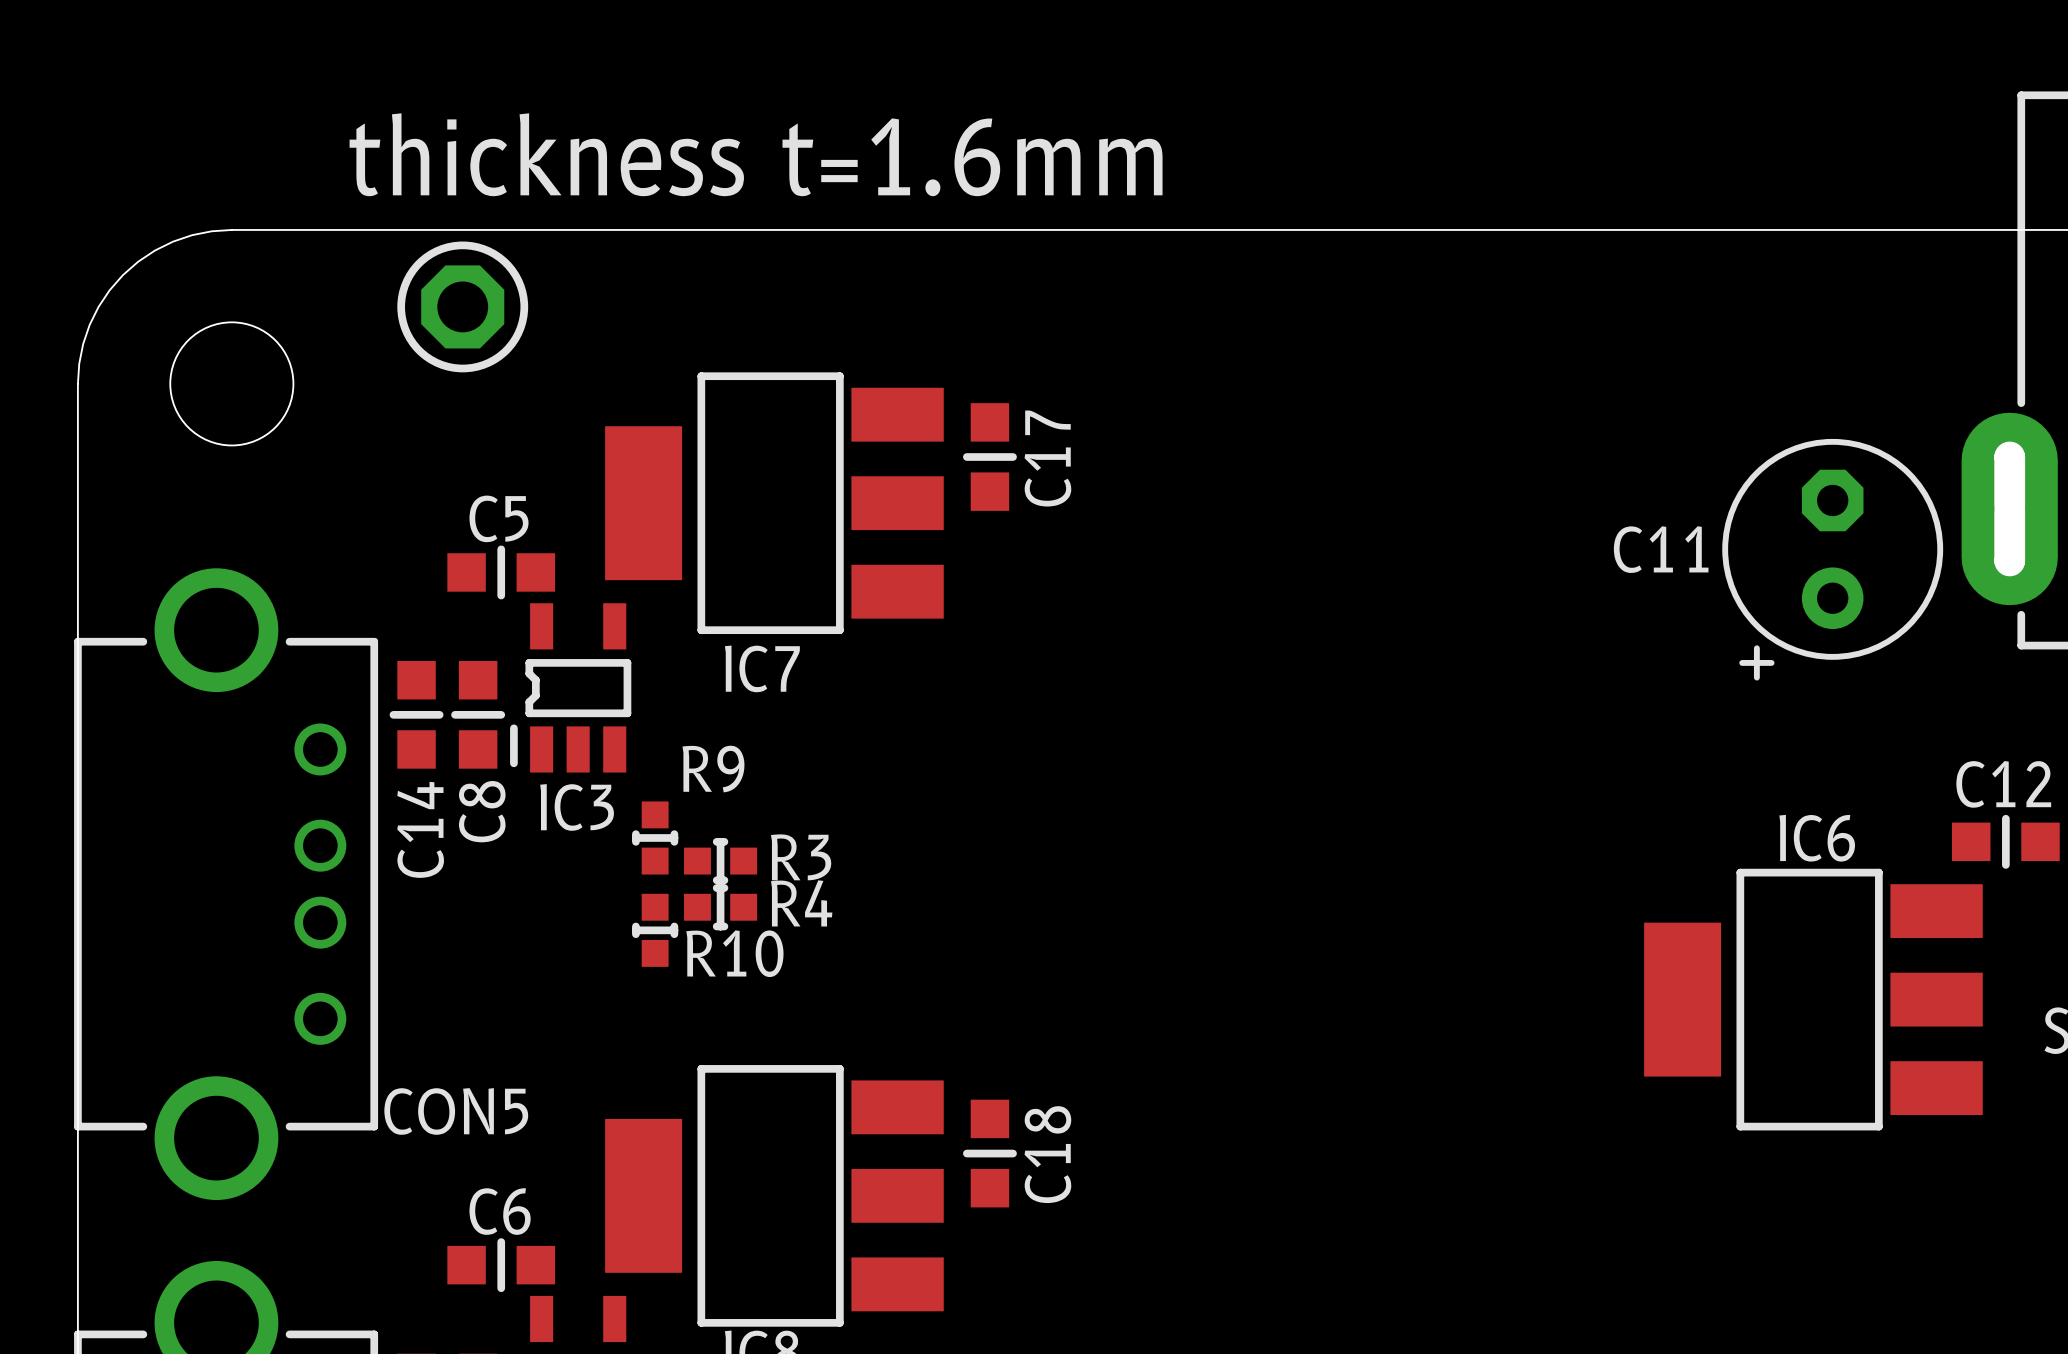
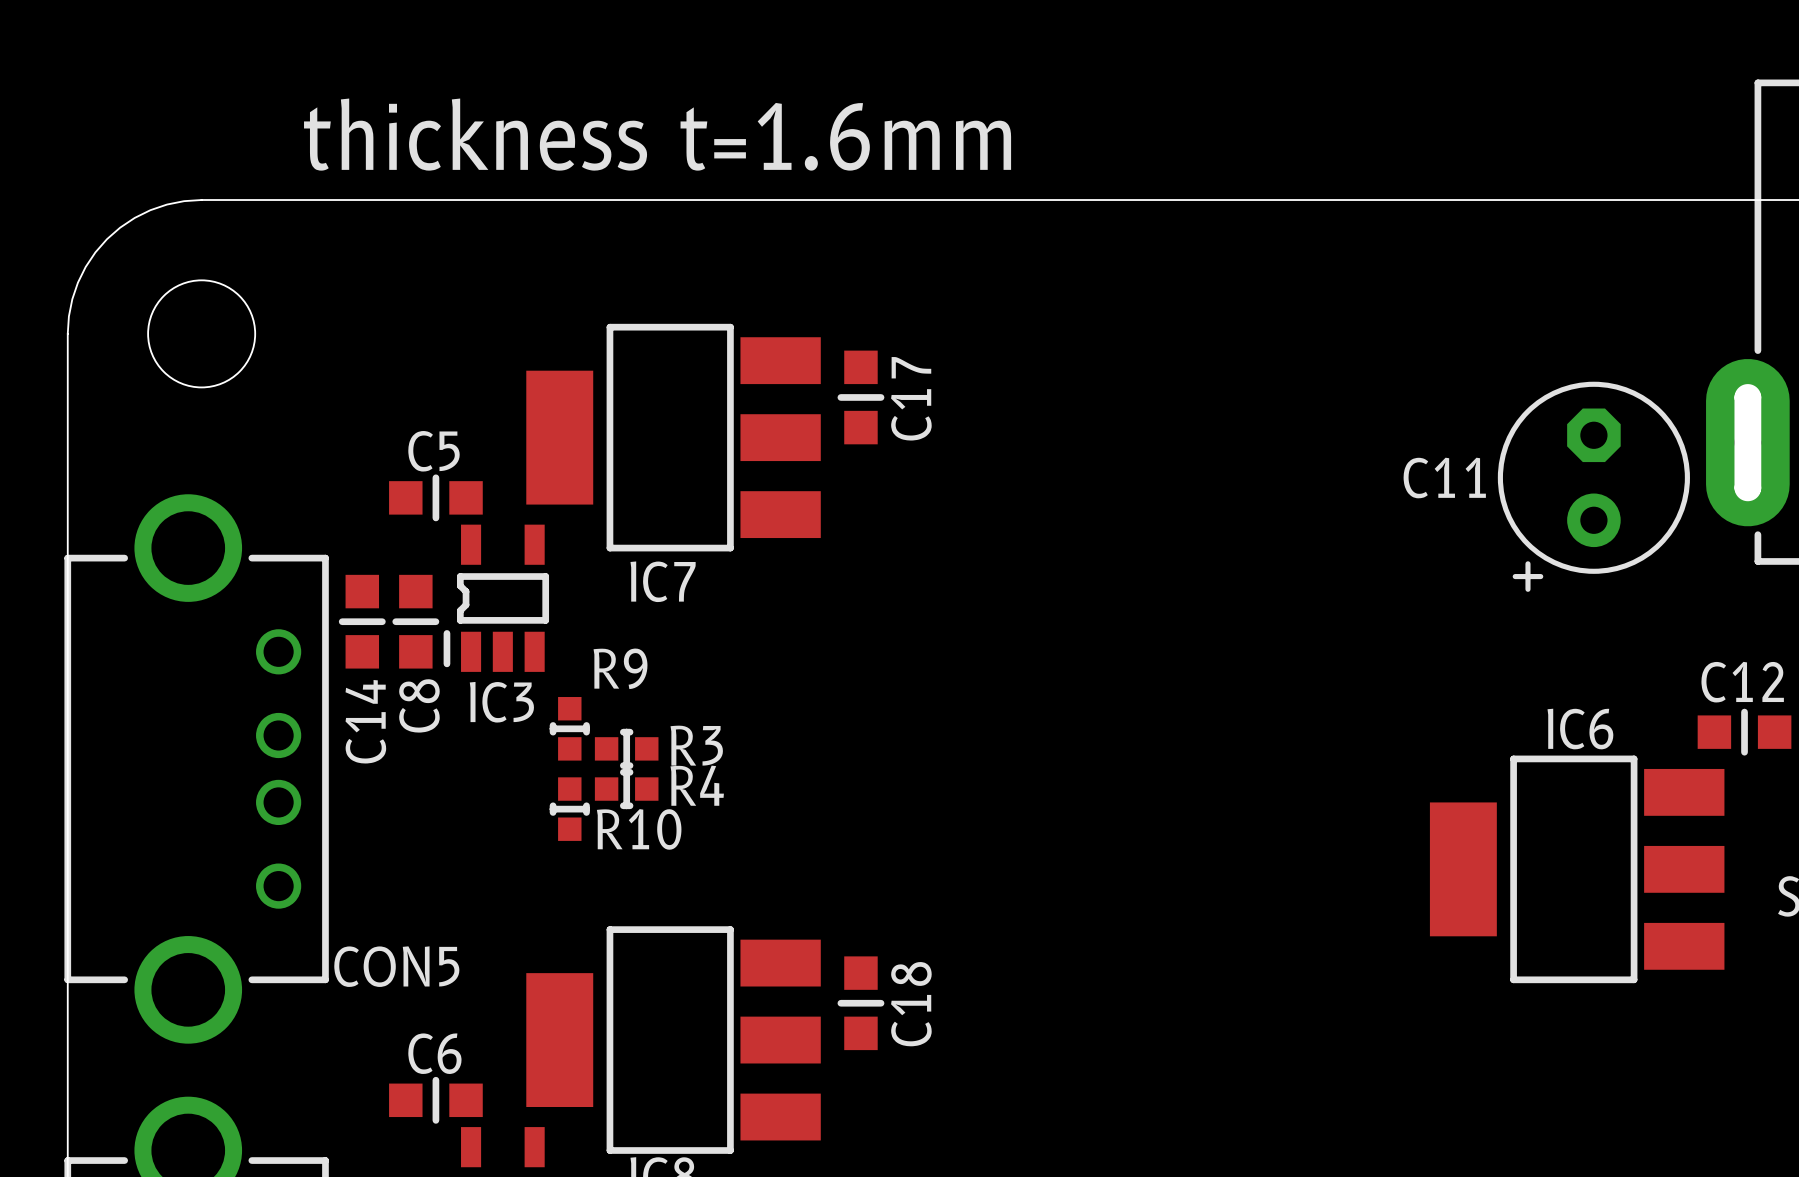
drawing: [397, 241, 529, 373] -> none
part: (462, 306) -> none

